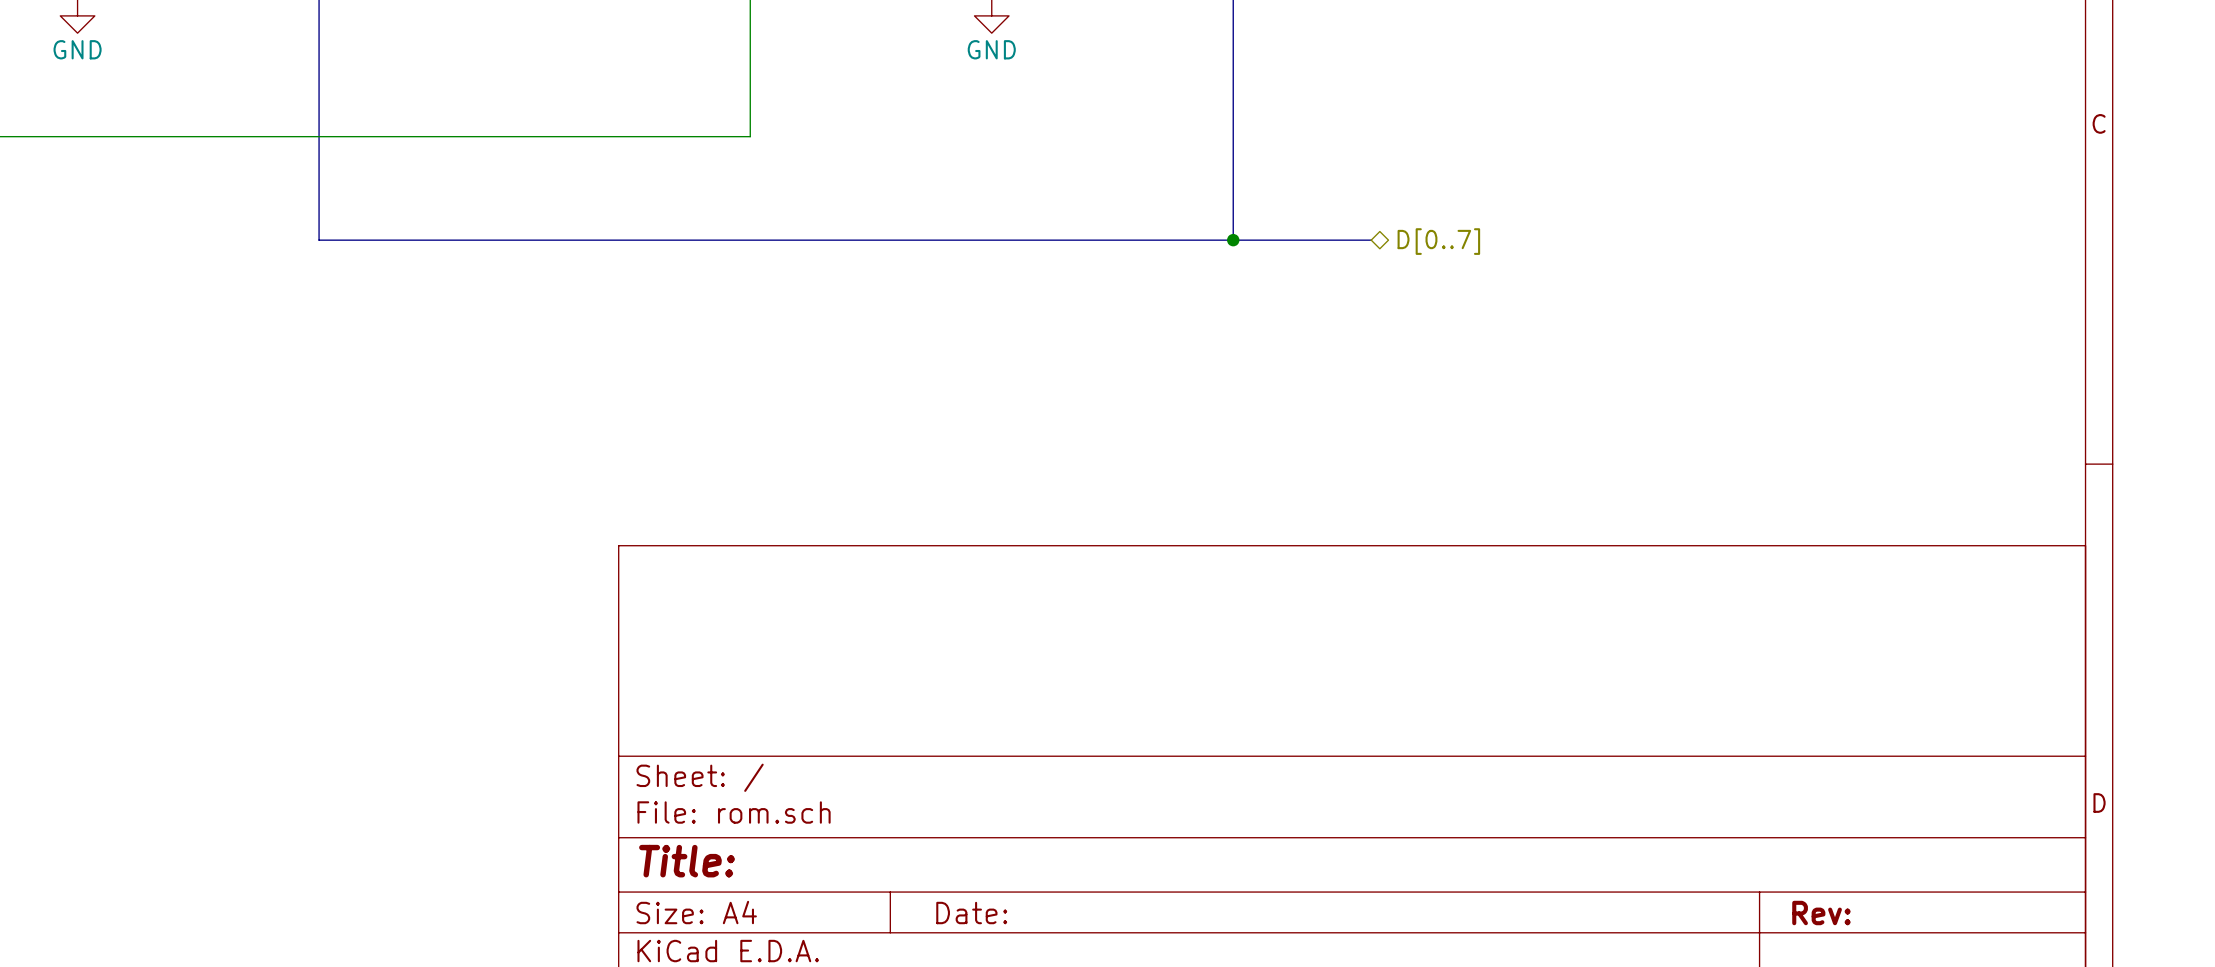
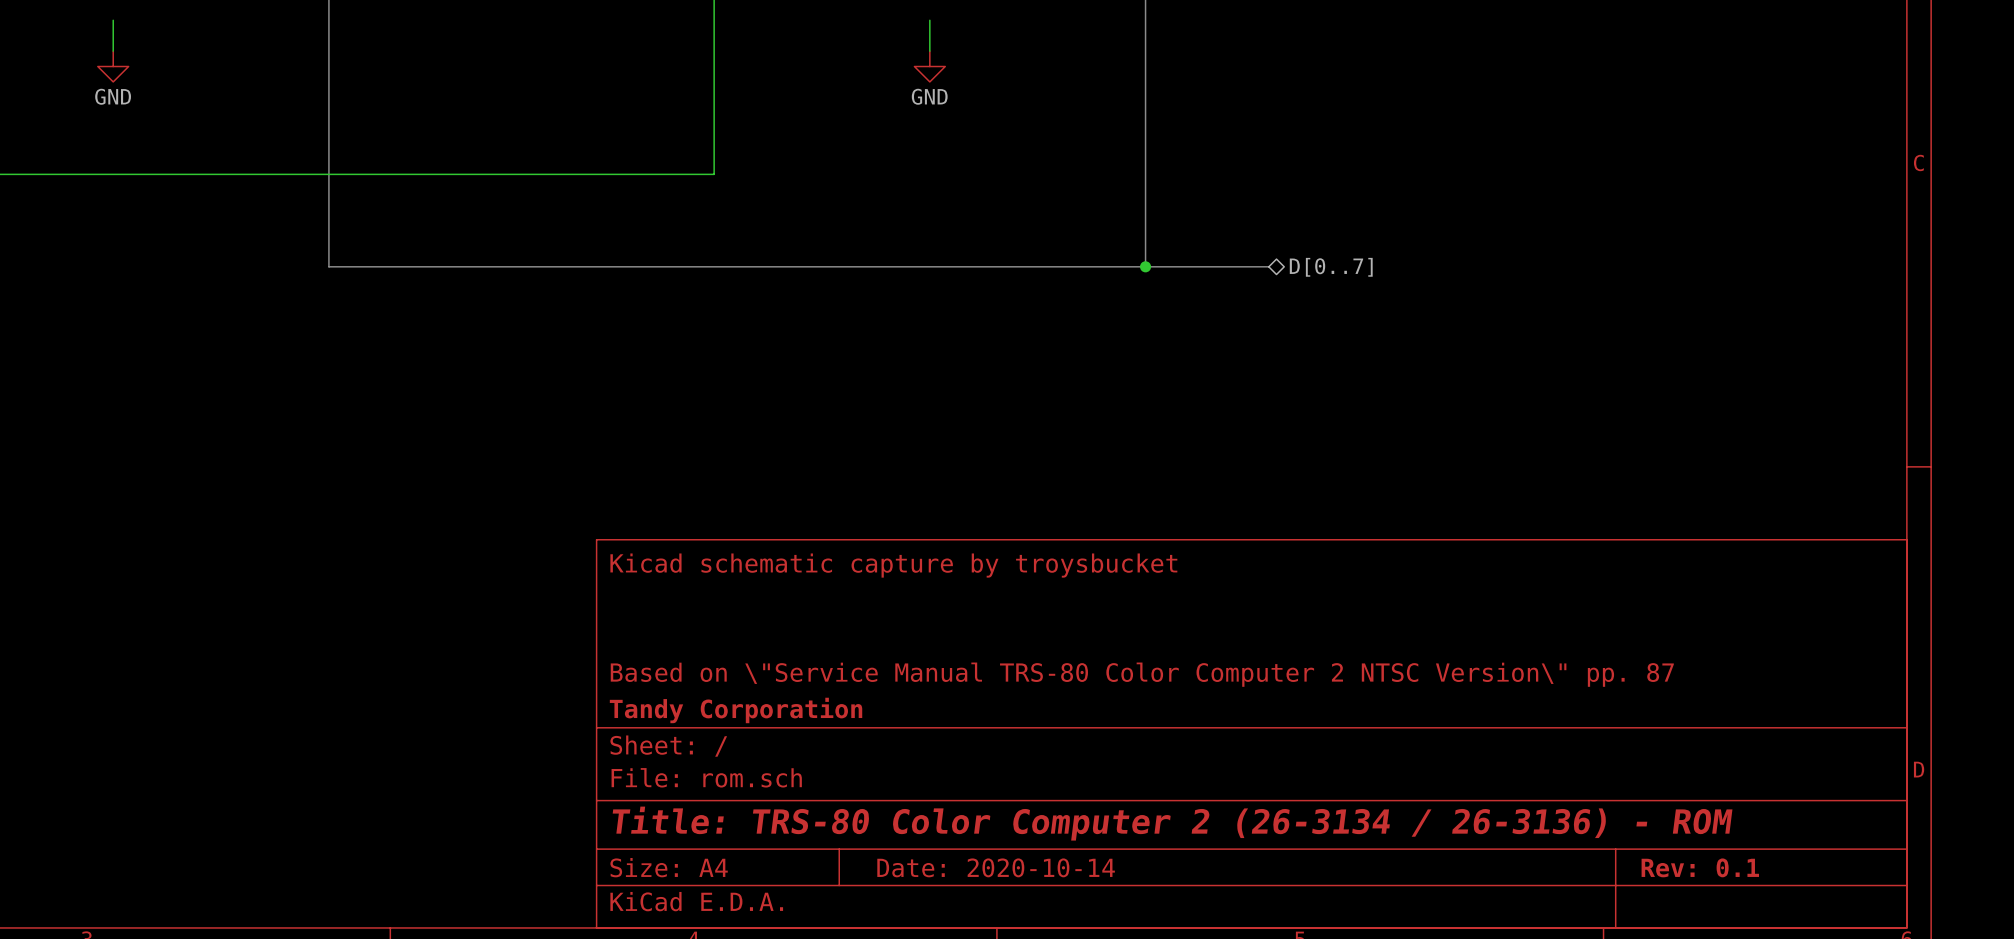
title block: none -> Kicad schematic capture by troysbucket (893, 565)
title block: none -> Based on \"Service Manual TRS-80 Color Computer 2 NTSC Version\" pp. 87 (1142, 674)
title block: none -> Tandy Corporation (736, 710)
title block: Title: (687, 861) -> Title: TRS-80 Color Computer 2 (26-3134 / 26-3136) - ROM (1172, 823)
title block: Date: (971, 913) -> Date: 2020-10-14 (996, 867)
title block: Rev: (1821, 913) -> Rev: 0.1 (1700, 867)

